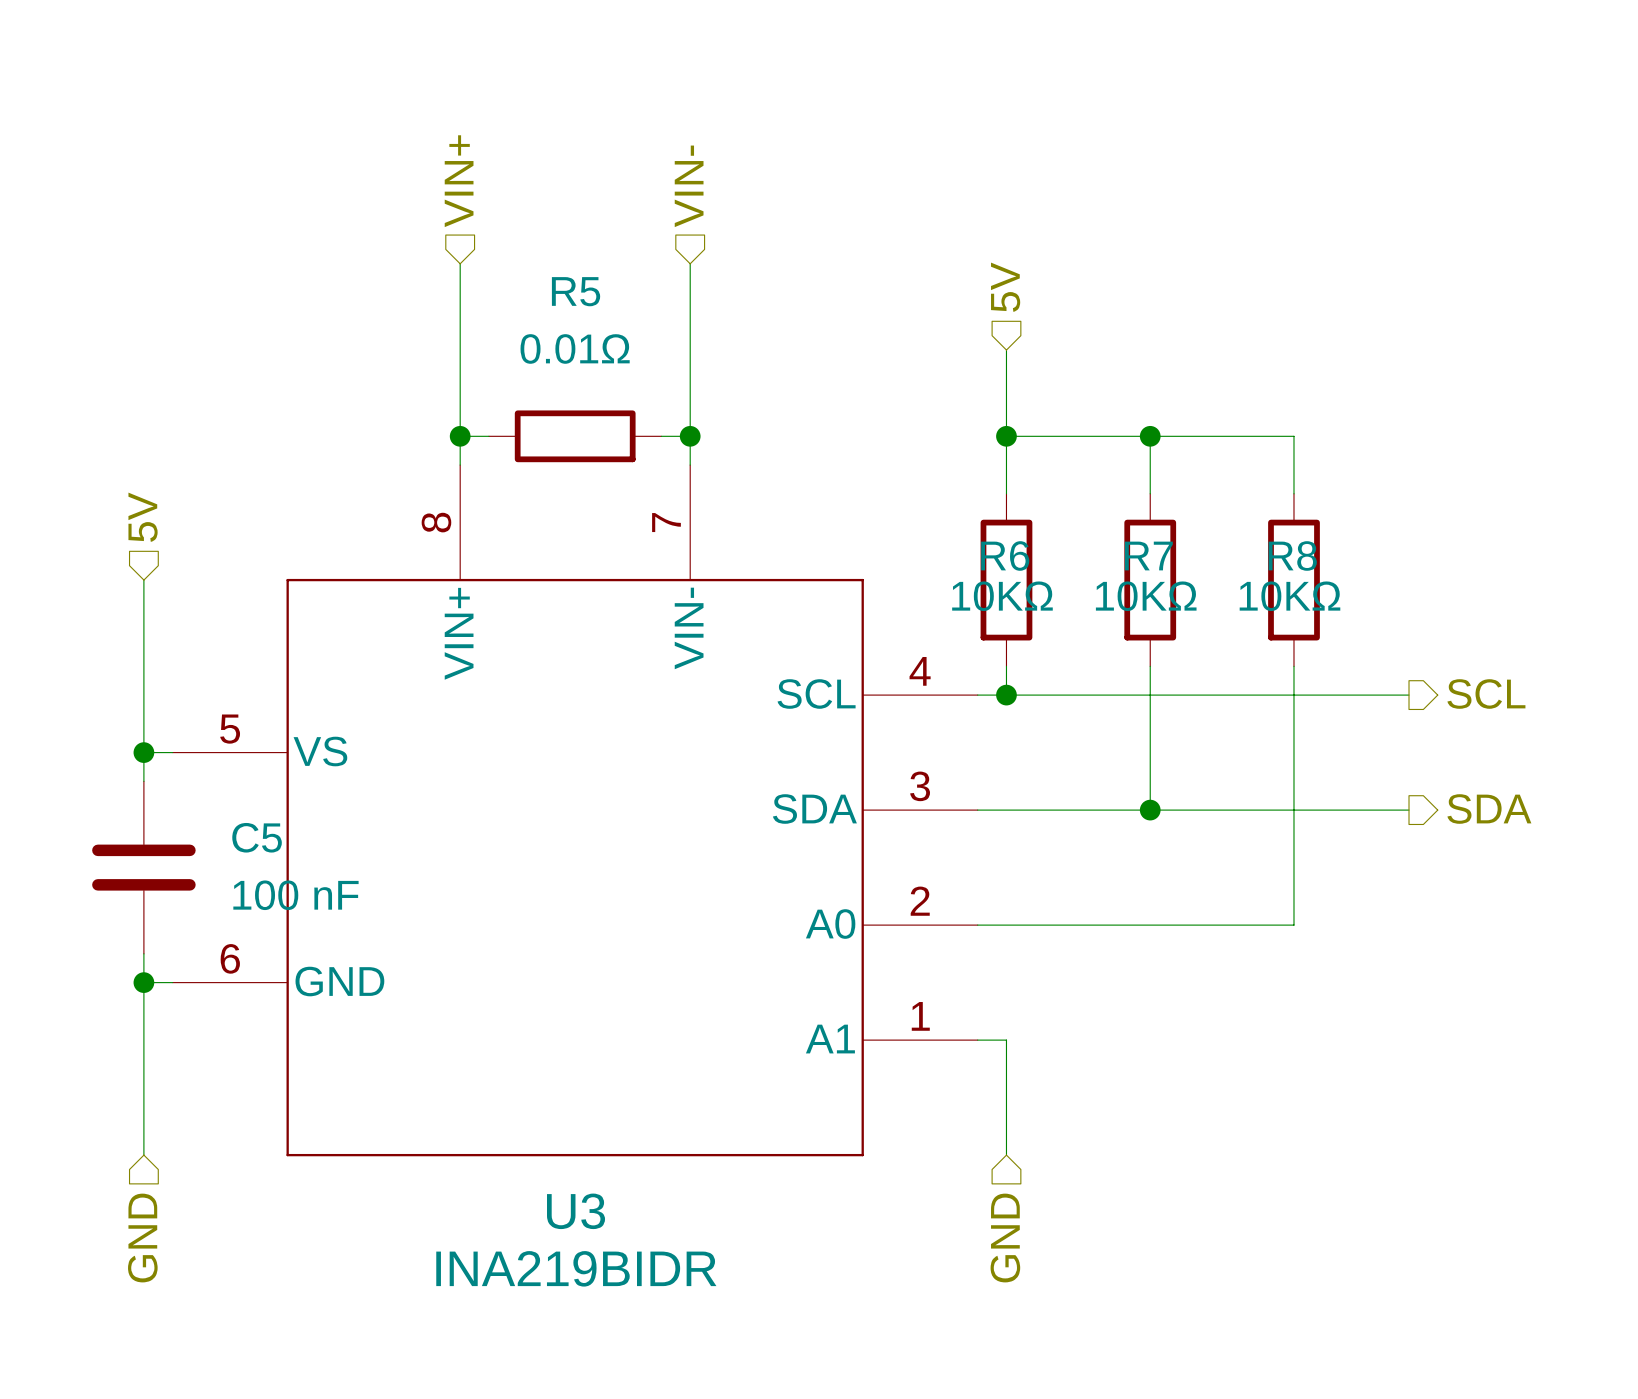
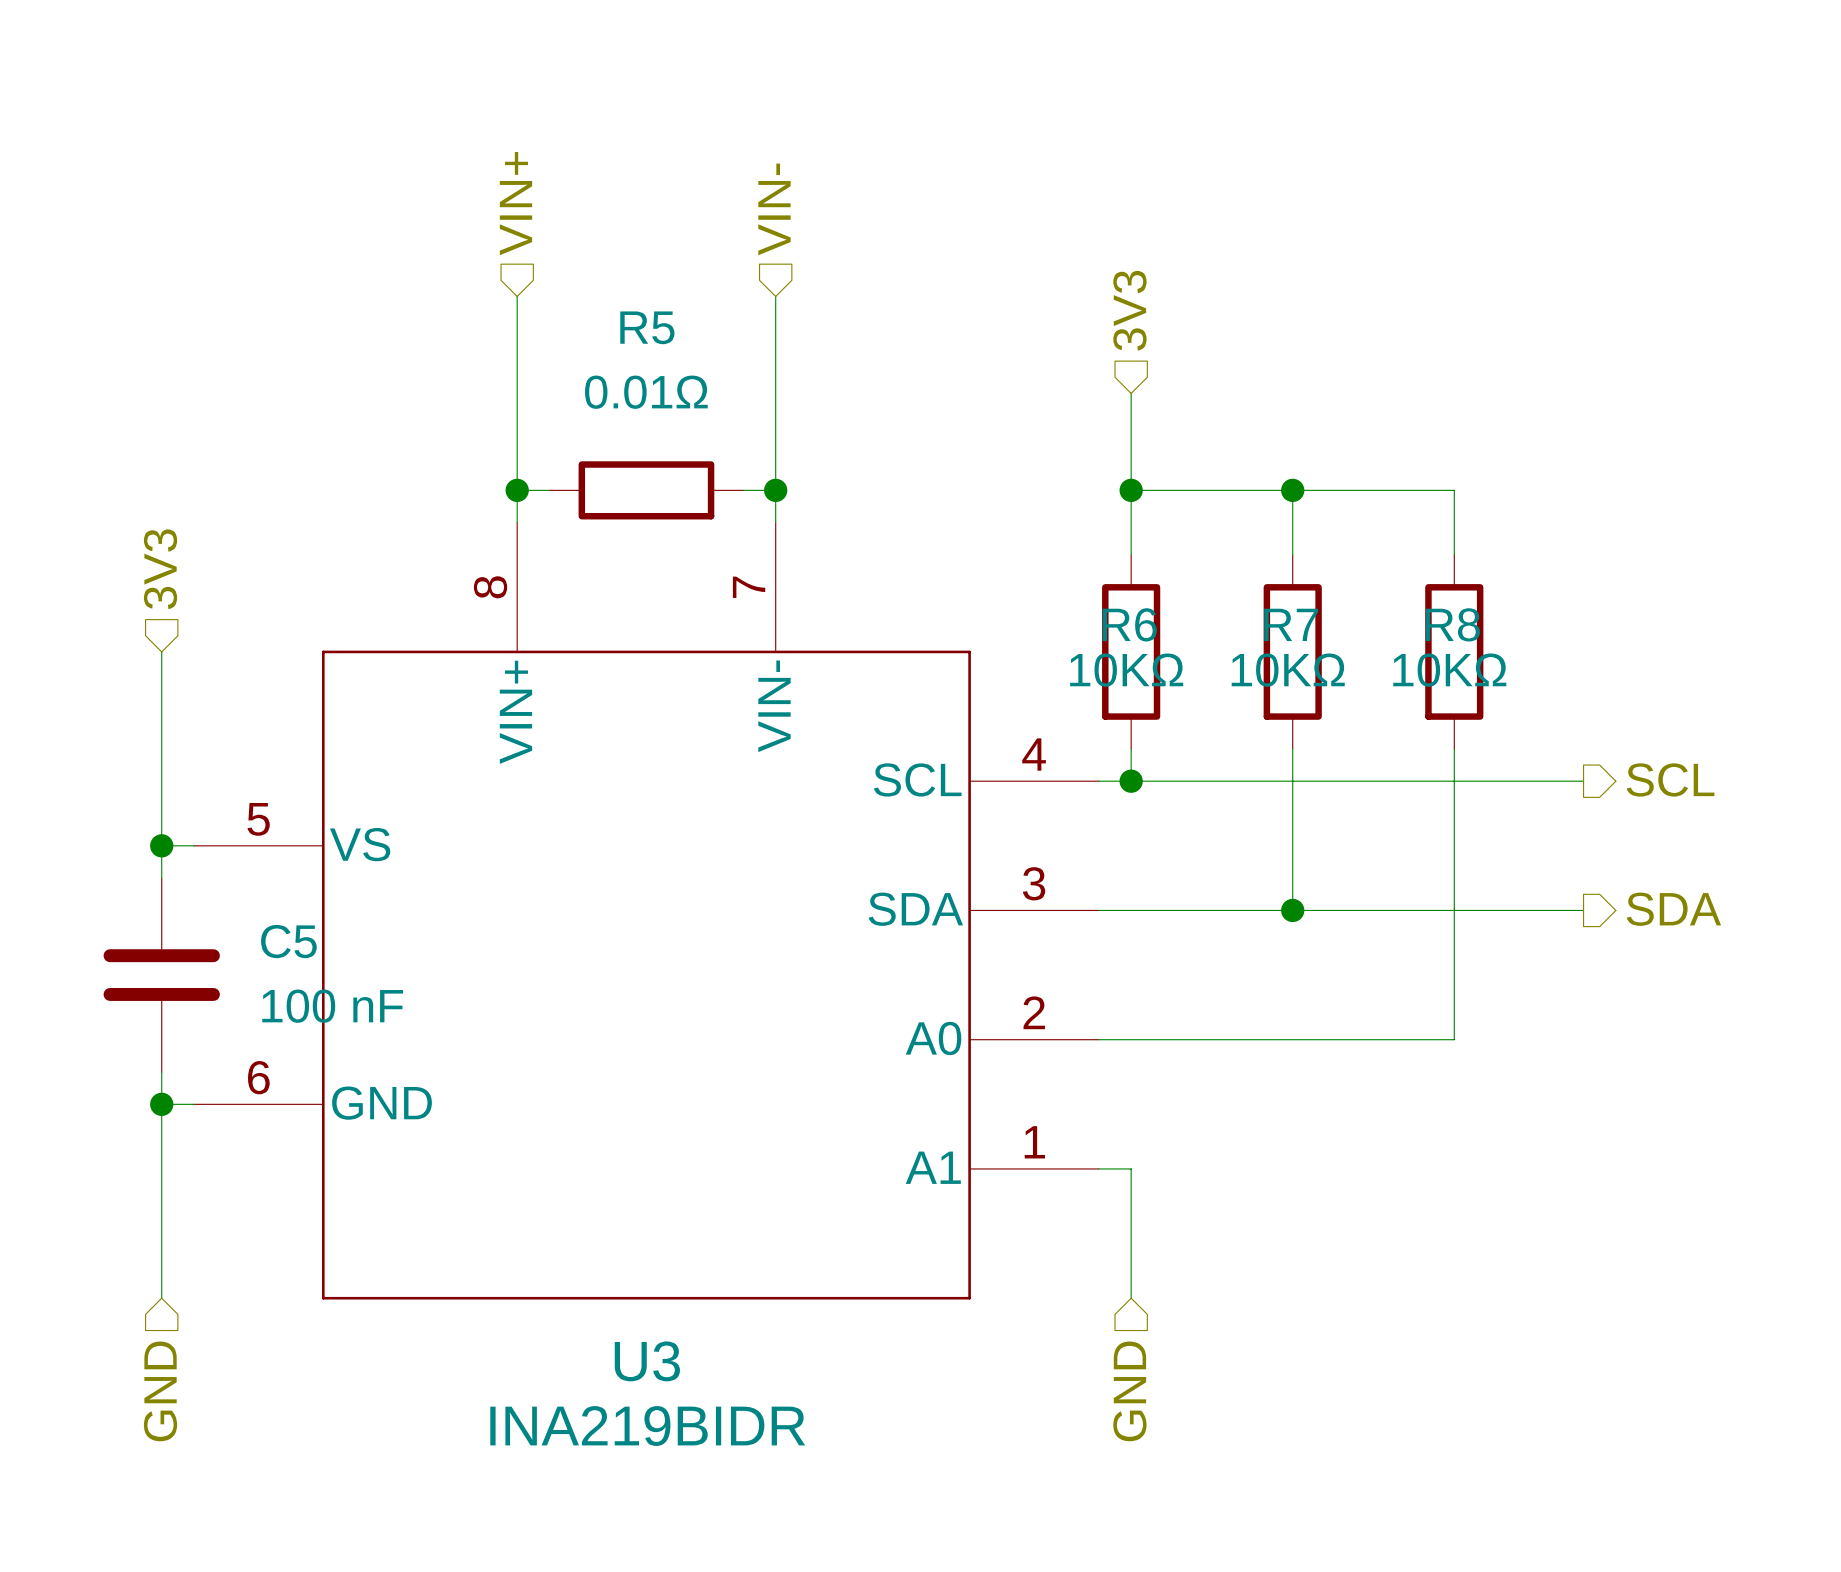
hierarchical label: 5V (1005, 287) -> 3V3 (1129, 310)
hierarchical label: 5V (143, 517) -> 3V3 (160, 569)

